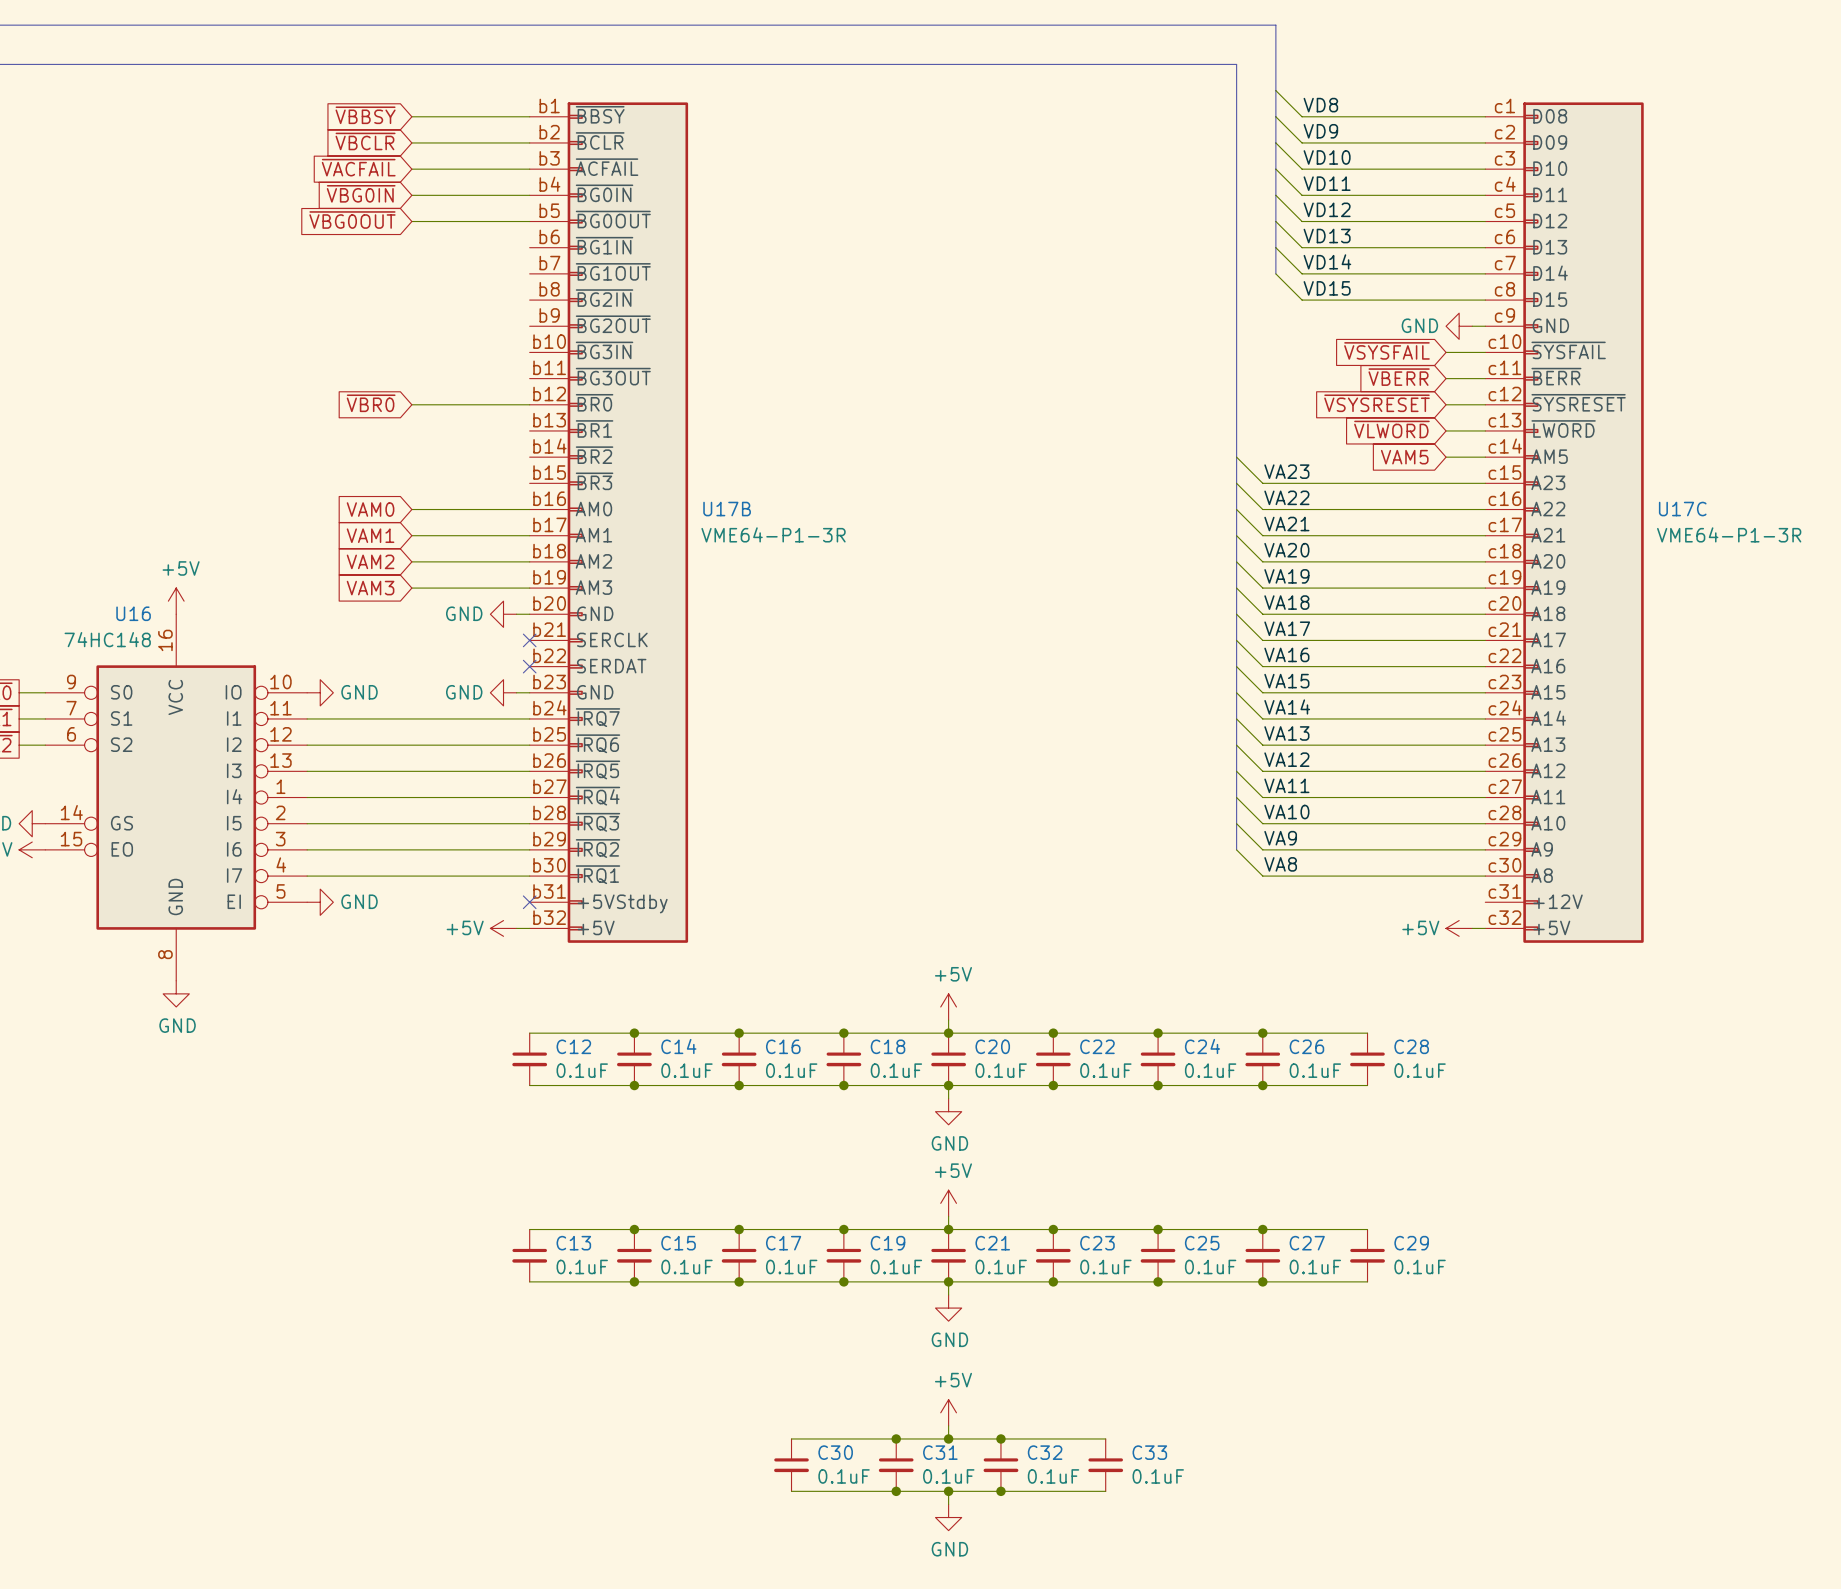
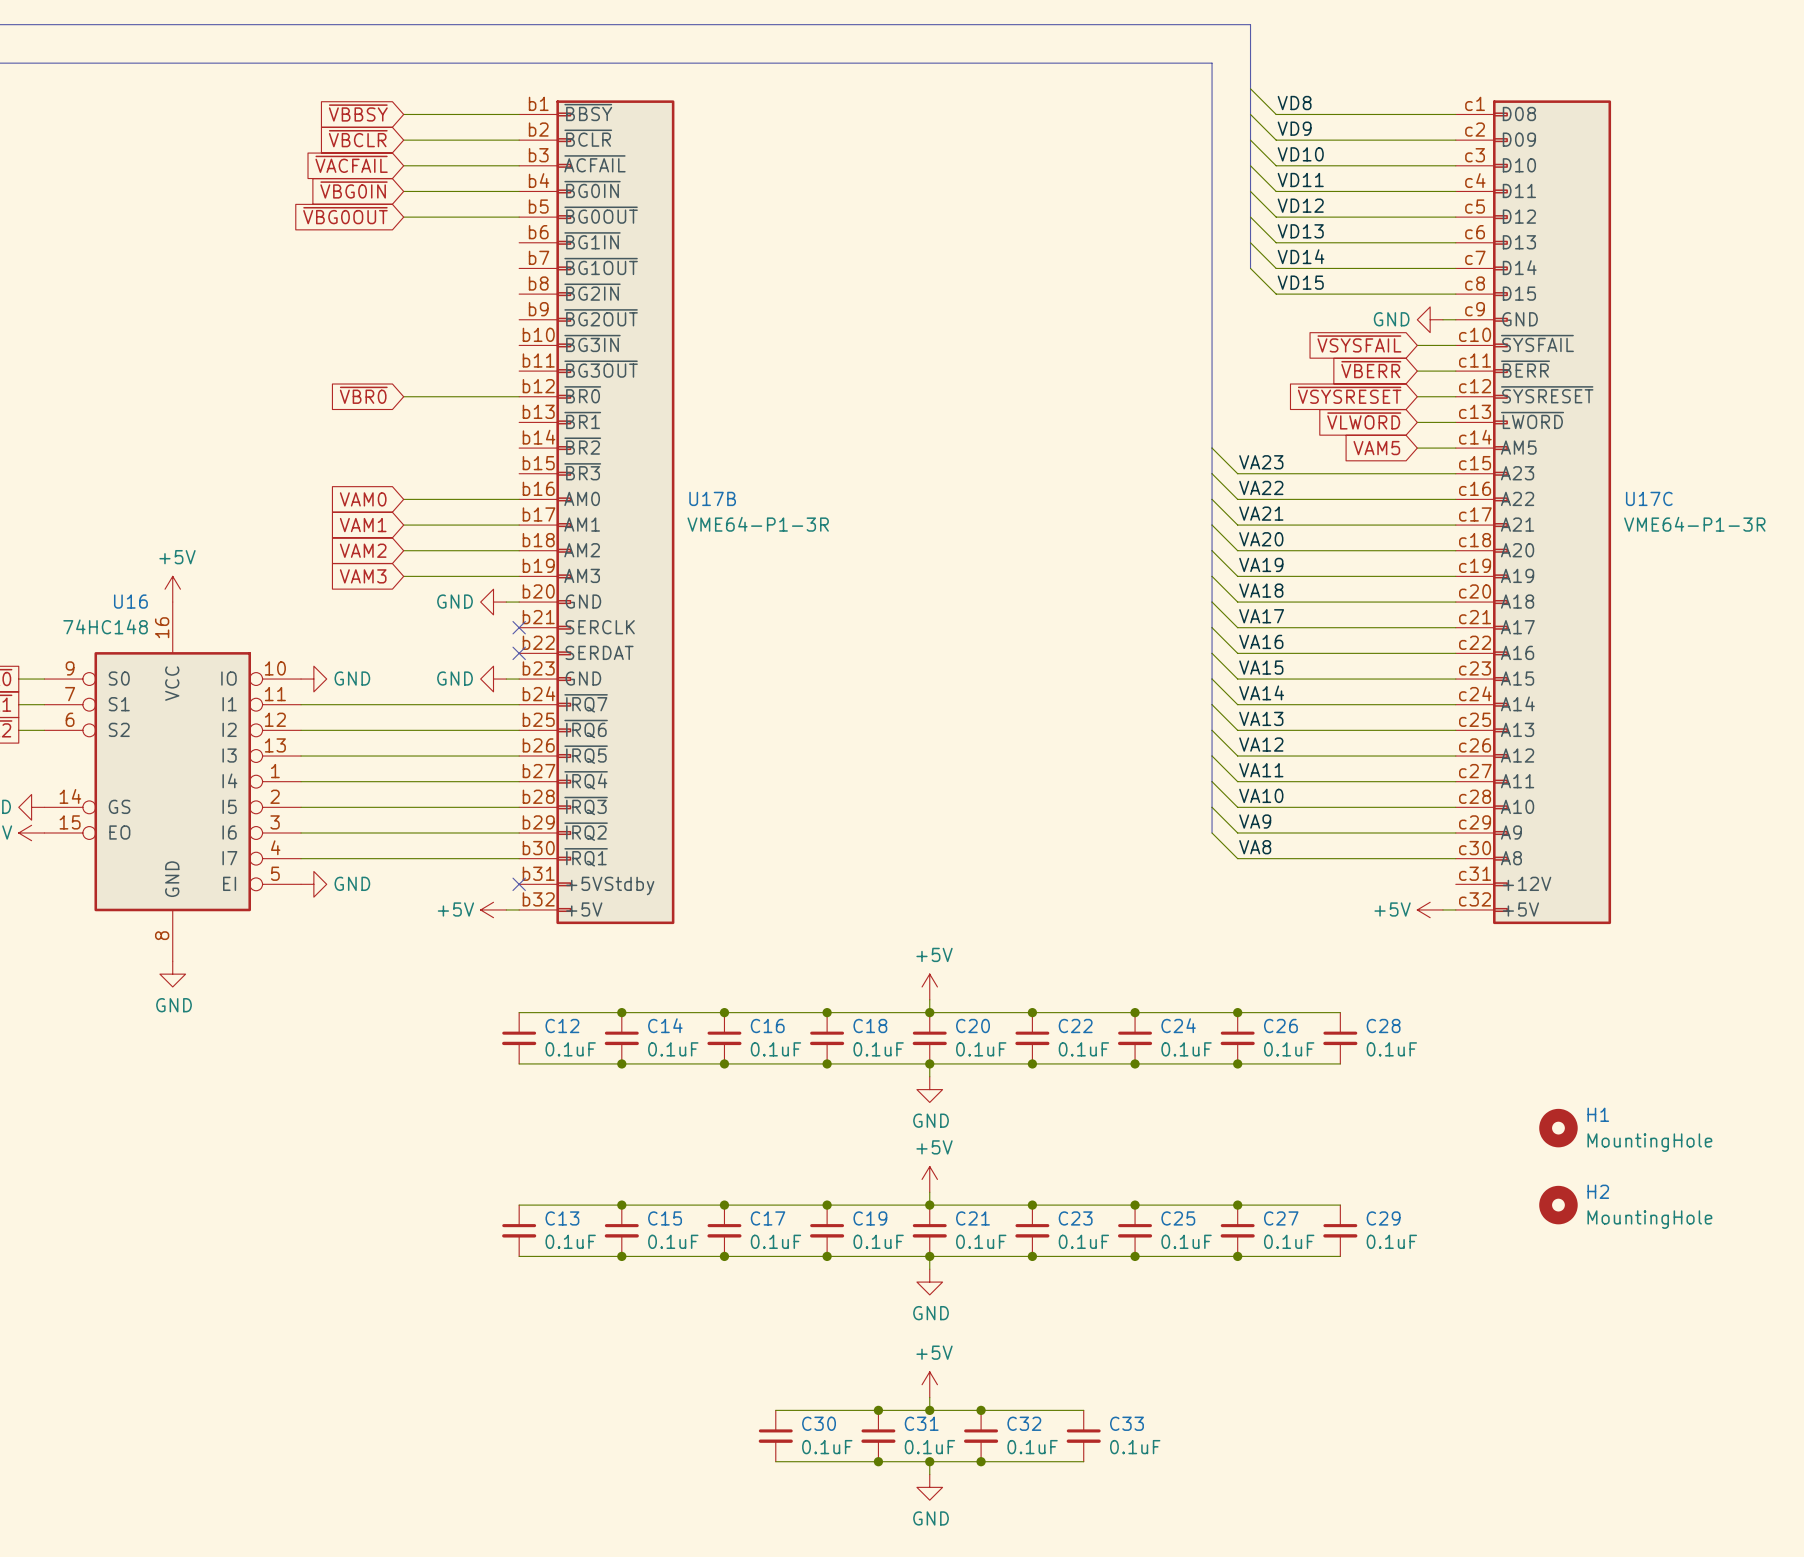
H1: none -> MountingHole (1558, 1128)
H2: none -> MountingHole (1558, 1205)

